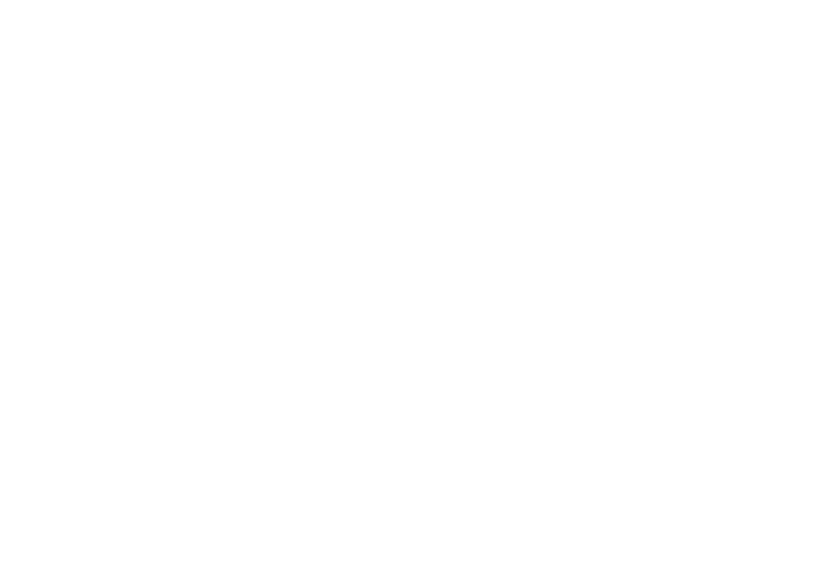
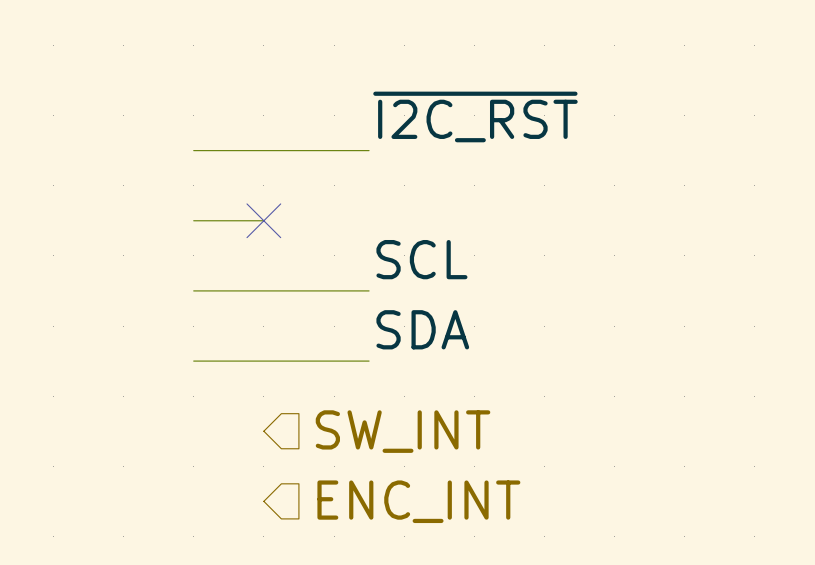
label: none -> ~{I2C_RST} (475, 116)
wire: none -> (193, 150) (369, 150)
wire: none -> (193, 220) (263, 220)
no-connect mark: none -> (263, 220)
label: none -> SCL (421, 259)
wire: none -> (193, 290) (369, 290)
label: none -> SDA (422, 329)
wire: none -> (193, 361) (369, 361)
hierarchical label: none -> SW_INT (403, 431)
hierarchical label: none -> ENC_INT (418, 501)

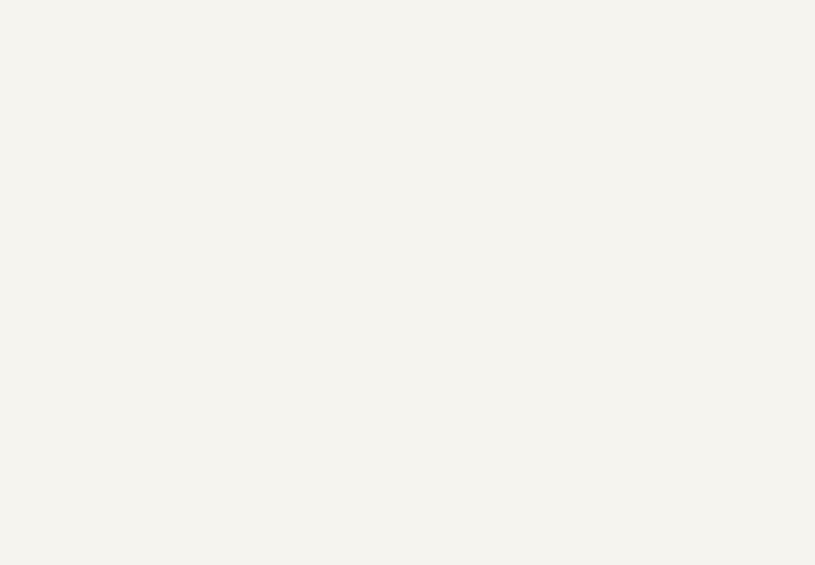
label: ~{I2C_RST} (475, 116) -> none
wire: (193, 150) (369, 150) -> none
wire: (193, 220) (263, 220) -> none
no-connect mark: (263, 220) -> none
label: SCL (421, 259) -> none
wire: (193, 290) (369, 290) -> none
label: SDA (422, 329) -> none
wire: (193, 361) (369, 361) -> none
hierarchical label: SW_INT (403, 431) -> none
hierarchical label: ENC_INT (418, 501) -> none

